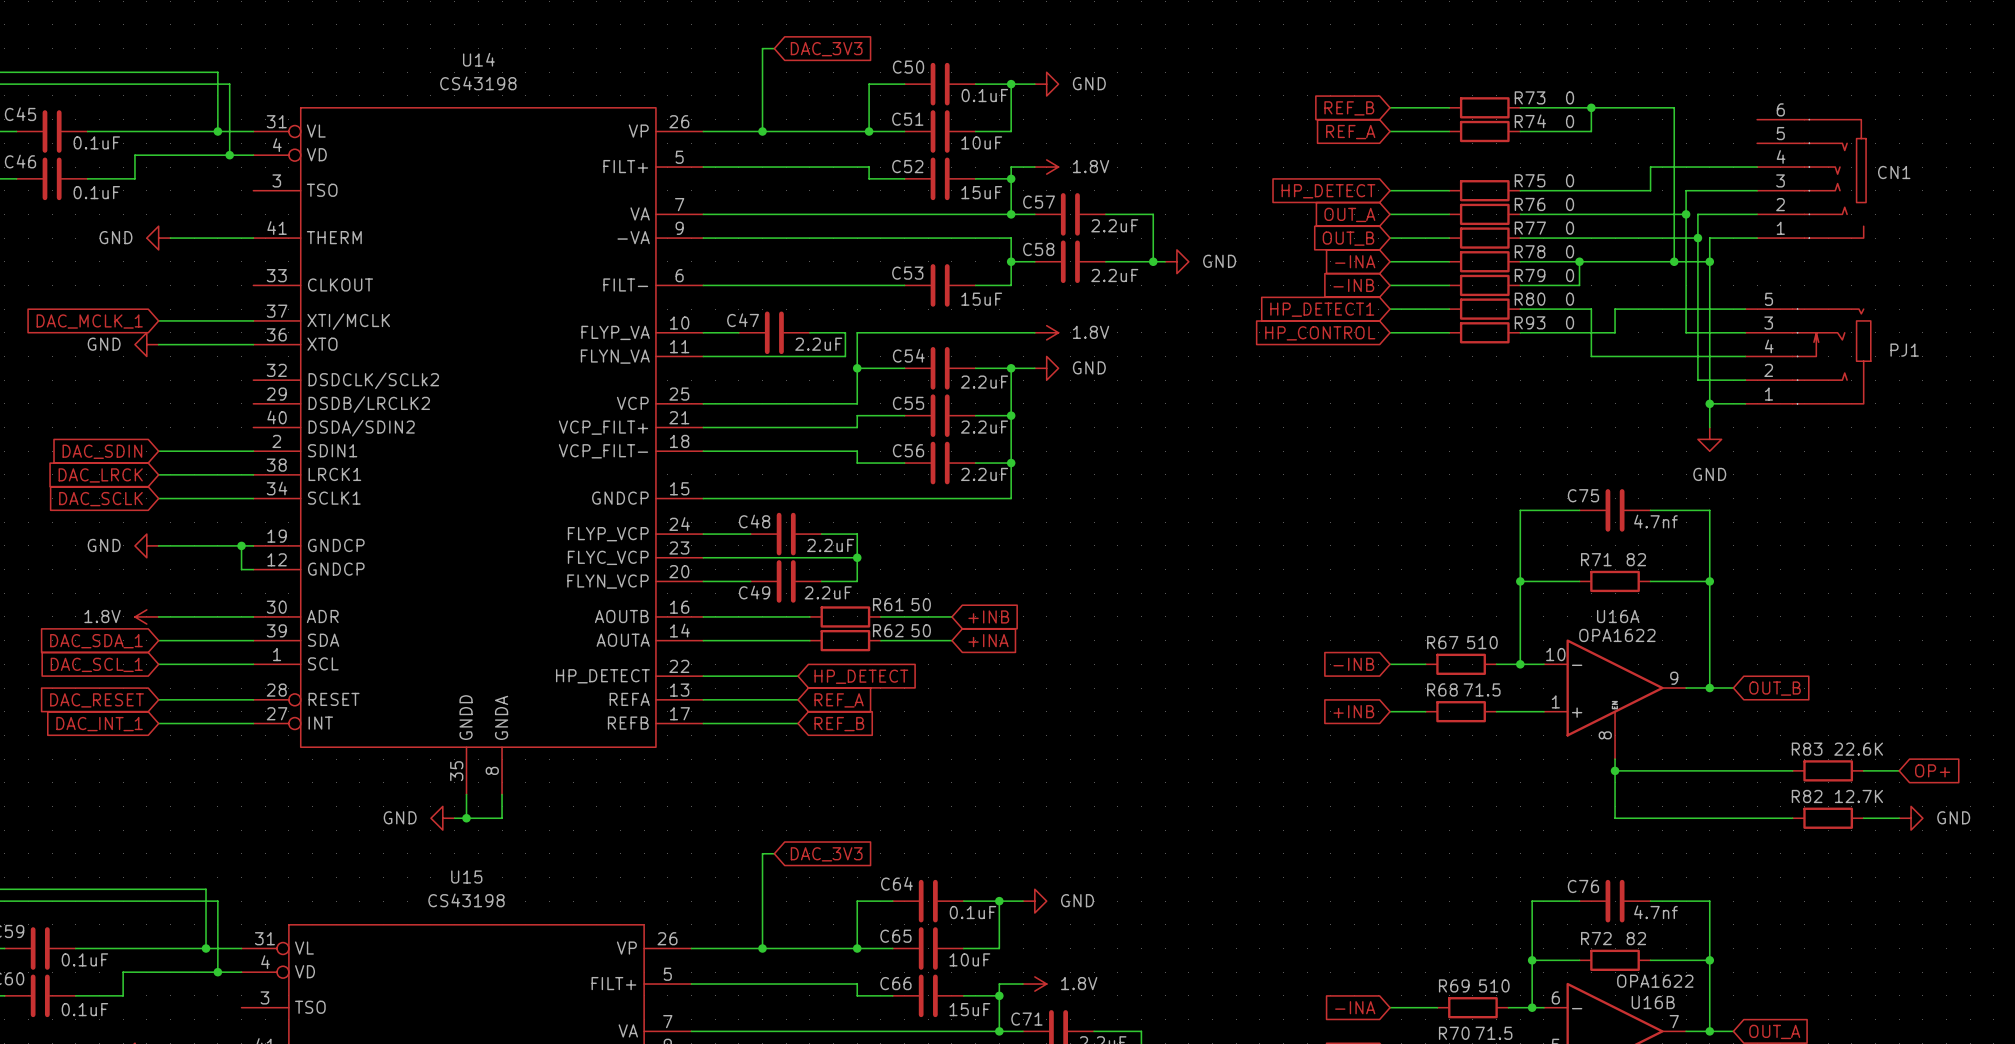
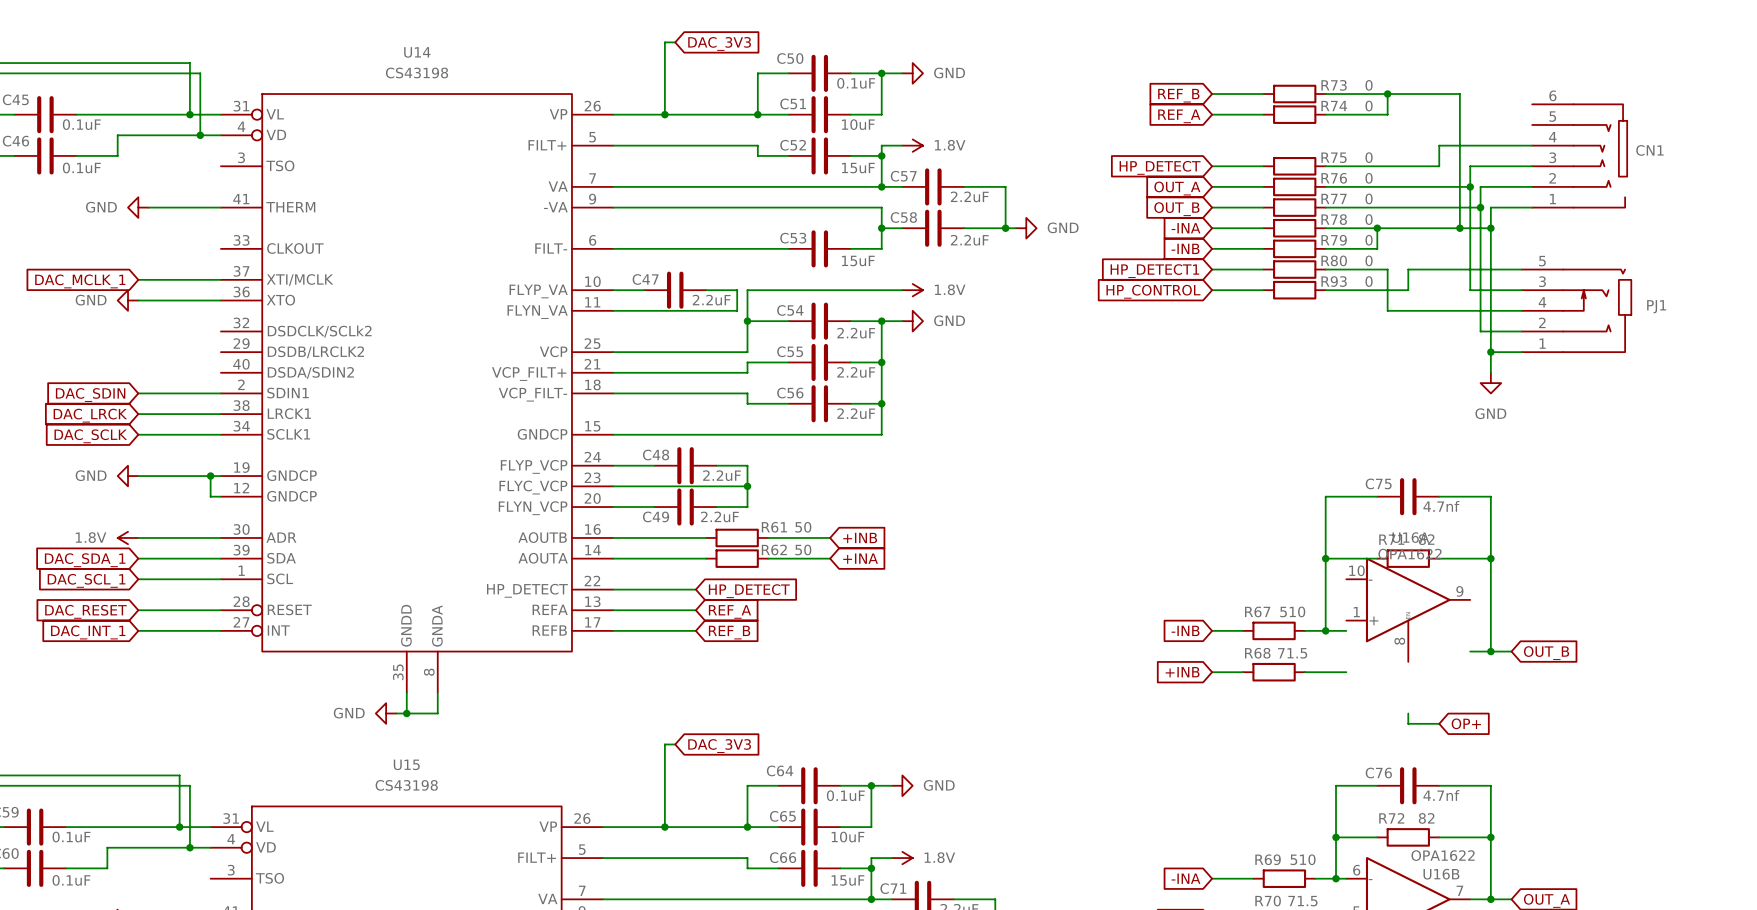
wire: (1579, 510) (1520, 510) (1520, 569) -> (1377, 496) (1325, 496)
C75 position: (1615, 510) -> (1408, 496)
wire: (1650, 510) (1709, 510) (1709, 569) -> (1439, 496) (1490, 496)
wire: (1520, 581) (1579, 581) -> (1325, 558) (1377, 558)
junction: (1520, 581) -> none
R71 position: (1615, 581) -> (1408, 558)
wire: (1650, 581) (1709, 581) -> (1439, 558) (1490, 558)
junction: (1709, 581) -> none
junction: none -> (1490, 558)
global label position: -INB (1353, 664) -> -INB (1185, 630)
wire: (1390, 664) (1425, 664) -> (1212, 630) (1243, 630)
R67 position: (1461, 664) -> (1274, 630)
wire: (1496, 664) (1543, 664) -> (1305, 630) (1346, 630)
wire: none -> (1325, 579) (1325, 630)
junction position: (1520, 664) -> (1325, 558)
wire: (1686, 688) (1733, 688) -> (1470, 651) (1511, 651)
wire: none -> (1490, 599) (1490, 651)
junction: (1709, 688) -> none
global label position: OUT_B (1775, 688) -> OUT_B (1546, 653)
global label position: +INB (1353, 711) -> +INB (1182, 672)
wire: (1390, 711) (1425, 711) -> (1212, 672) (1243, 672)
R68 position: (1461, 711) -> (1274, 672)
wire: (1496, 711) (1543, 711) -> (1305, 672) (1346, 672)
junction: none -> (1325, 630)
junction: none -> (1490, 651)
wire: (1615, 759) (1615, 818) (1792, 818) -> none
wire: (1615, 770) (1792, 770) -> none
junction: (1615, 770) -> none
R83: 22.6K (1828, 770) -> none
wire: (1863, 770) (1899, 770) -> none
global label: OP+ (1932, 770) -> none
wire: none -> (1408, 713) (1408, 723) (1439, 723)
R82: 12.7K (1828, 818) -> none
wire: (1863, 818) (1899, 818) -> none
power symbol: GND (1911, 818) -> none
global label: none -> OP+ (1466, 723)

